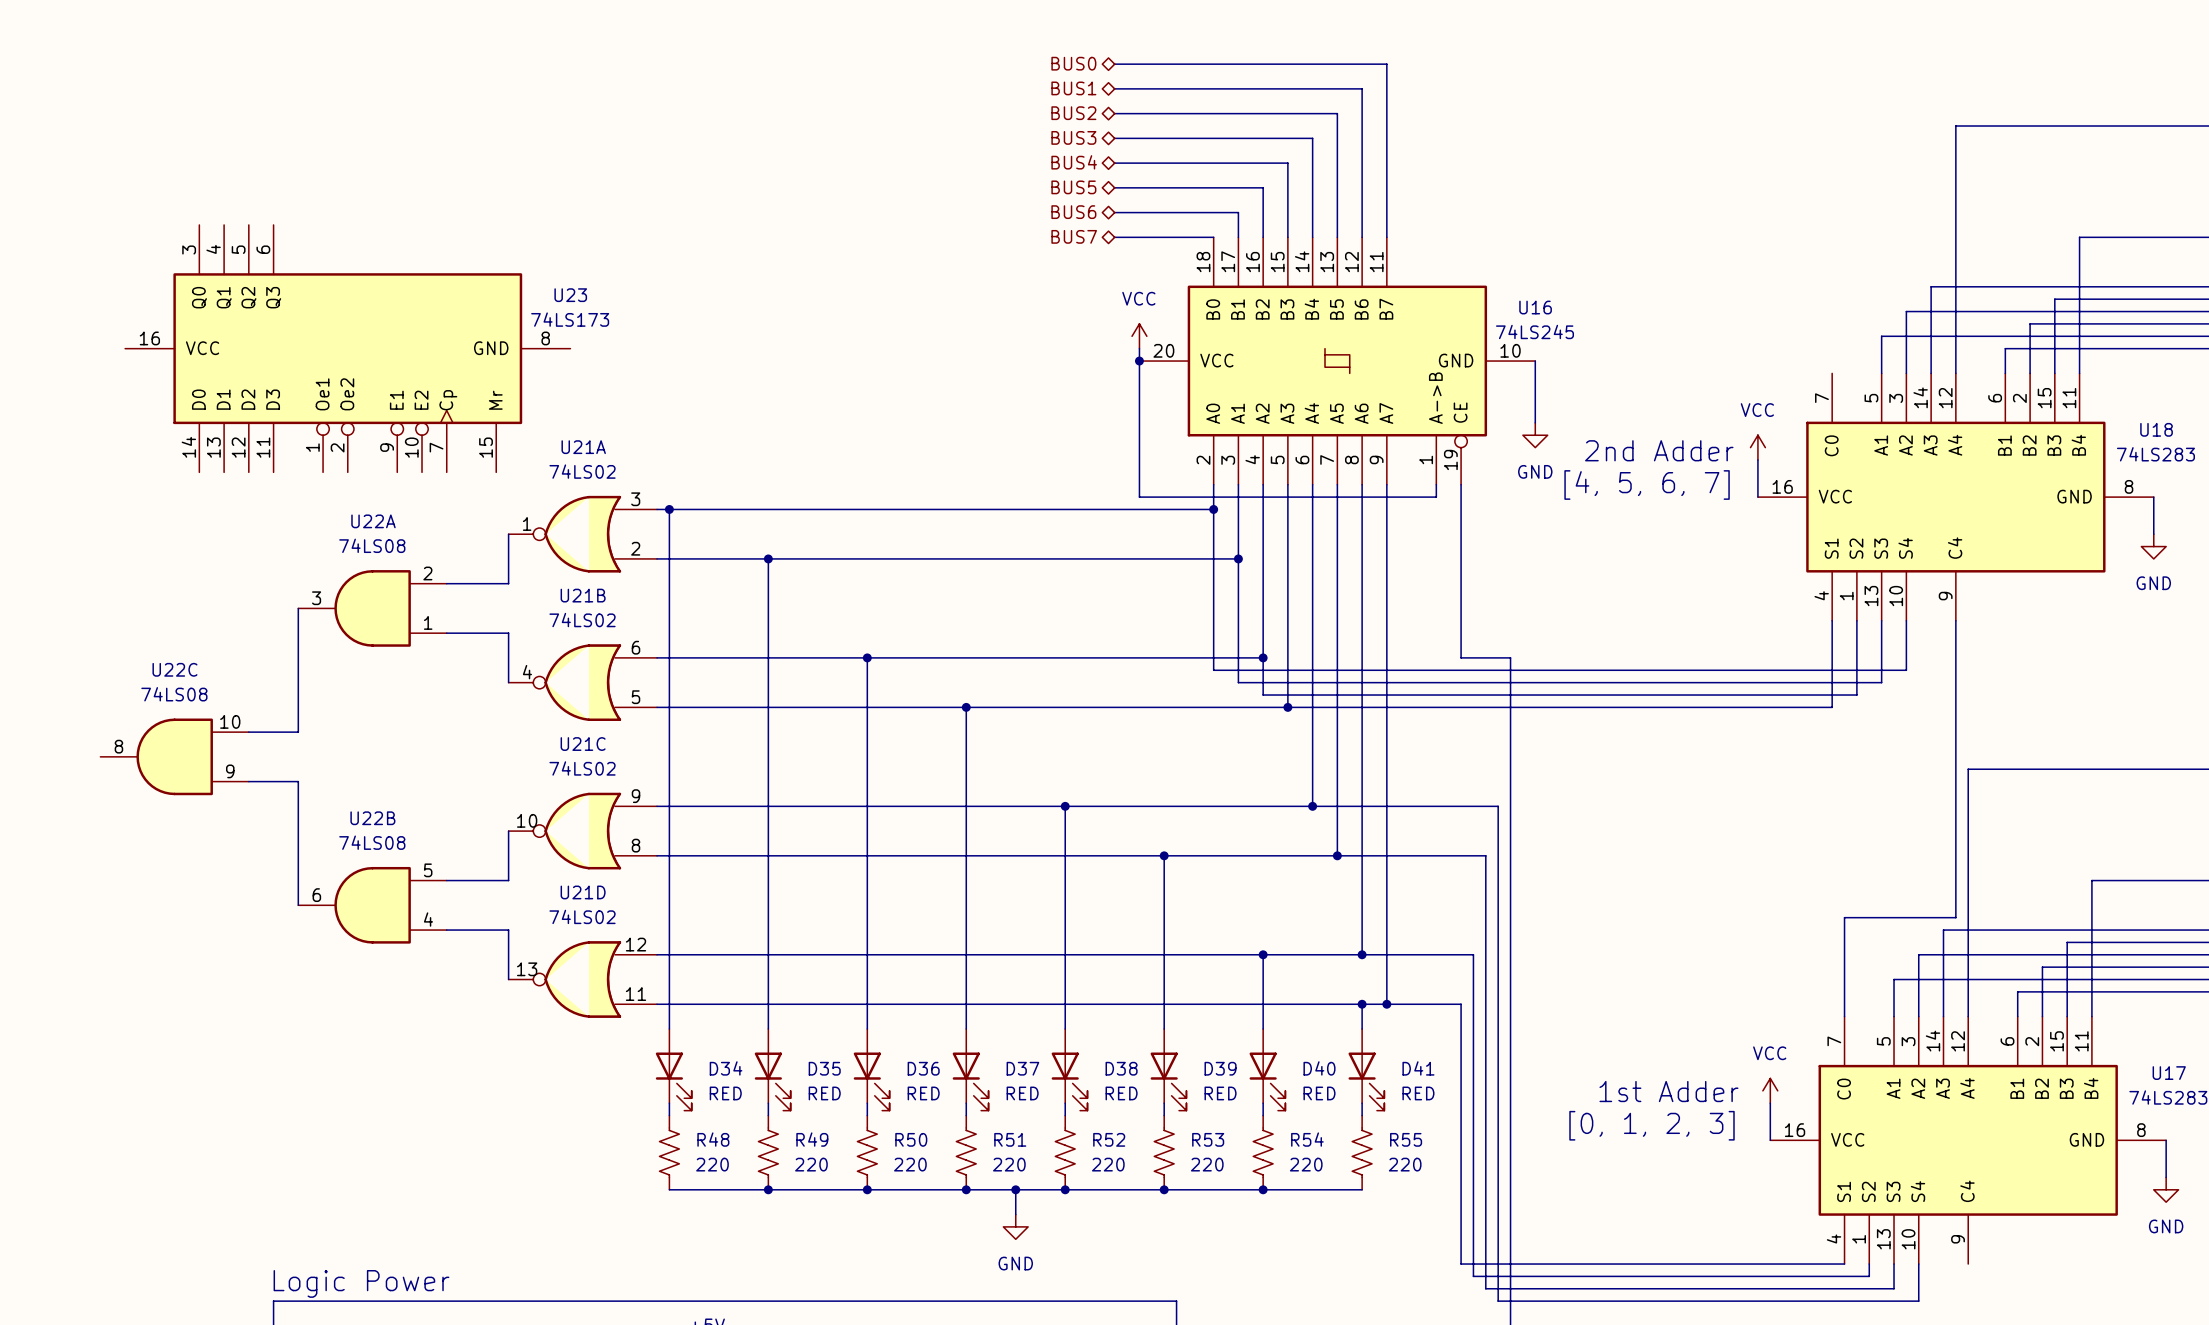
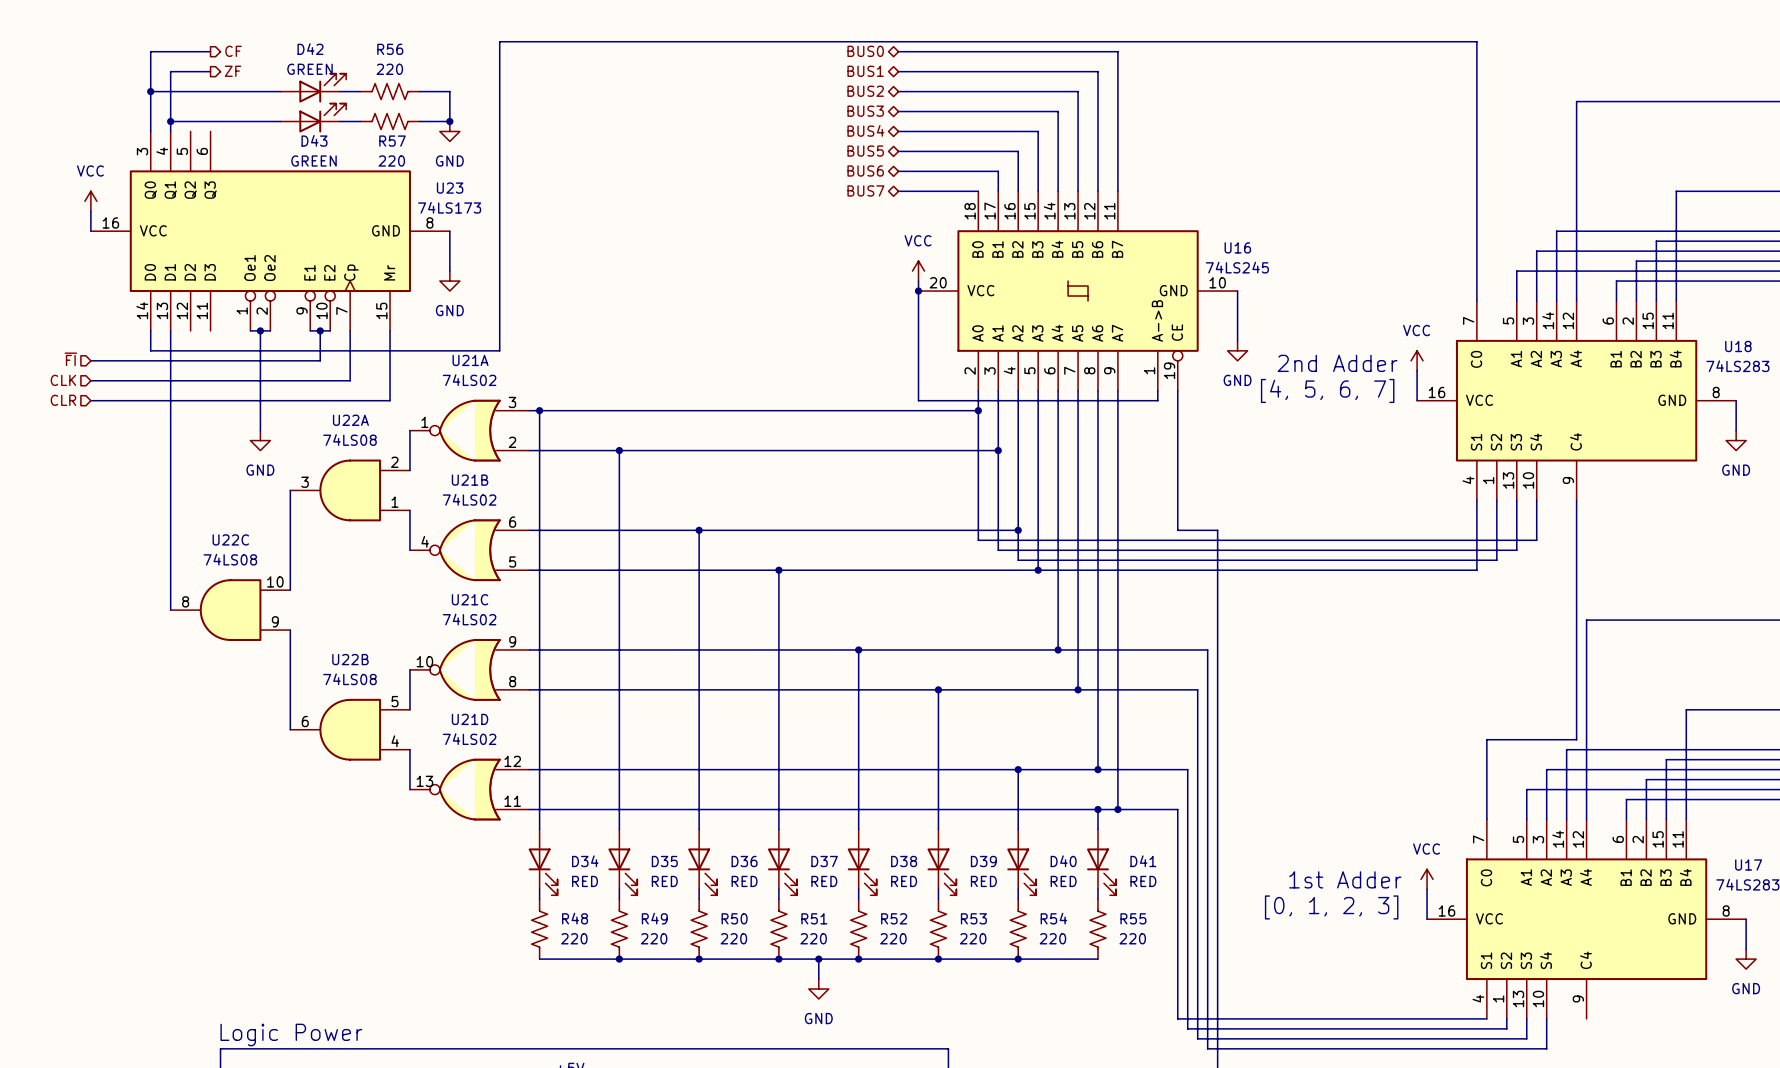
hierarchical label: none -> CF (233, 51)
wire: none -> (210, 51) (150, 51) (150, 131)
wire: none -> (210, 71) (170, 71) (170, 131)
hierarchical label: none -> ZF (233, 71)
D42: none -> GREEN (313, 88)
wire: none -> (150, 91) (280, 91)
junction: none -> (150, 91)
wire: none -> (340, 91) (360, 91)
R56: none -> 220 (390, 91)
wire: none -> (419, 91) (449, 91) (449, 121) (419, 121)
D43: none -> GREEN (313, 118)
wire: none -> (170, 121) (280, 121)
junction: none -> (170, 121)
wire: none -> (340, 121) (360, 121)
R57: none -> 220 (390, 121)
junction: none -> (449, 121)
power symbol: none -> GND (449, 131)
power symbol: none -> VCC (90, 201)
wire: none -> (90, 211) (90, 231)
wire: none -> (449, 231) (449, 271)
U23 position: (347, 348) -> (270, 231)
power symbol: none -> GND (449, 281)
wire: none -> (1476, 300) (1476, 41) (499, 41) (499, 350) (150, 350) (150, 330)
wire: none -> (170, 330) (170, 610)
wire: none -> (260, 330) (260, 430)
junction: none -> (260, 330)
wire: none -> (320, 330) (320, 360) (90, 360)
junction: none -> (320, 330)
wire: none -> (350, 330) (350, 380) (90, 380)
wire: none -> (390, 330) (390, 400) (90, 400)
hierarchical label: none -> ~{FI} (70, 359)
hierarchical label: none -> CLK (63, 380)
hierarchical label: none -> CLR (63, 400)
power symbol: none -> GND (260, 440)
wire: (298, 608) (298, 732) (248, 732) -> none
wire: none -> (290, 490) (290, 590)
U22A position: (372, 608) -> (350, 490)
U22C position: (174, 756) -> (230, 610)
wire: (248, 781) (298, 781) (298, 905) -> none
wire: none -> (290, 630) (290, 729)
U22B position: (372, 905) -> (350, 729)

